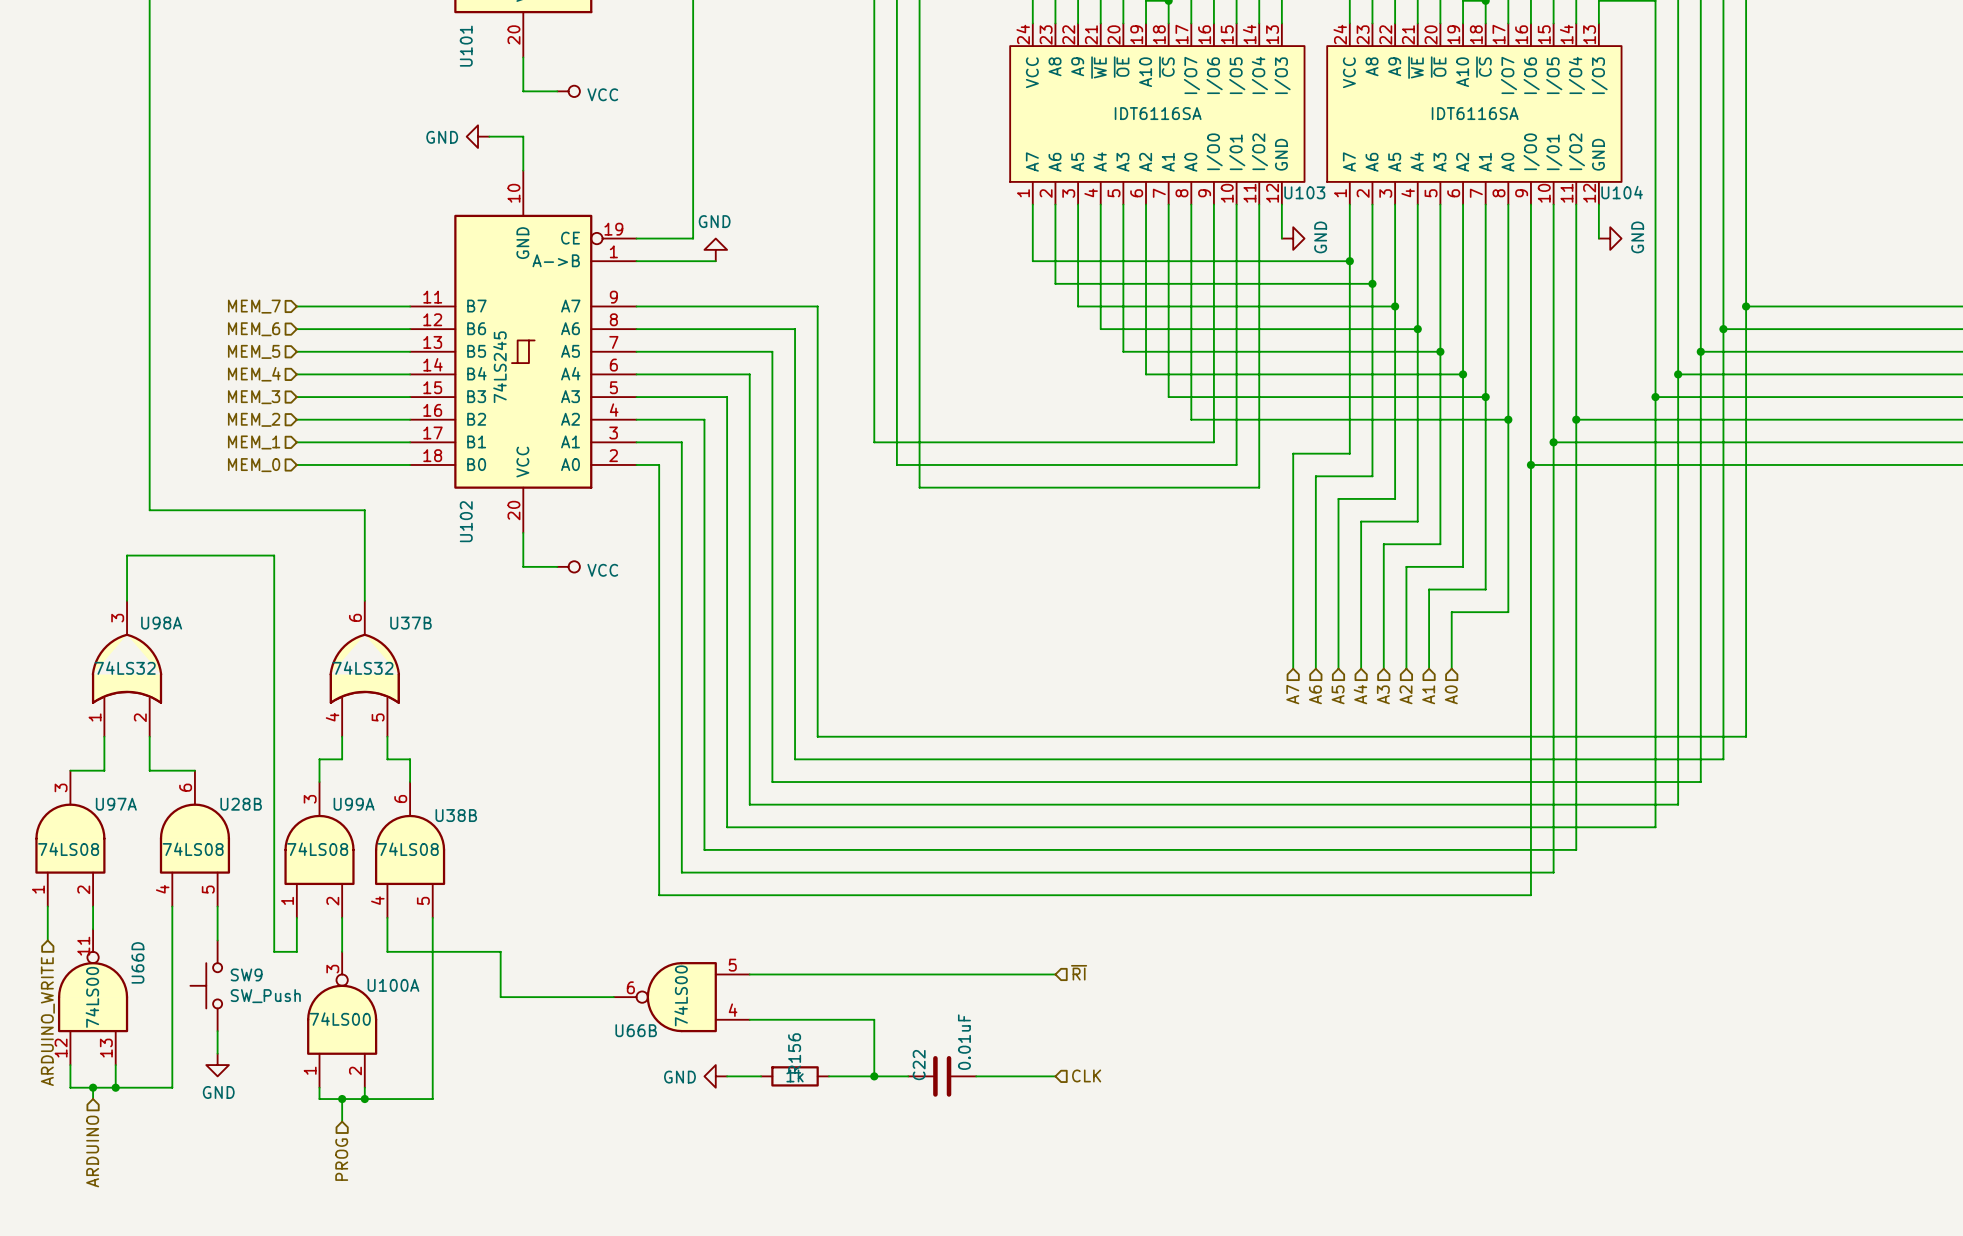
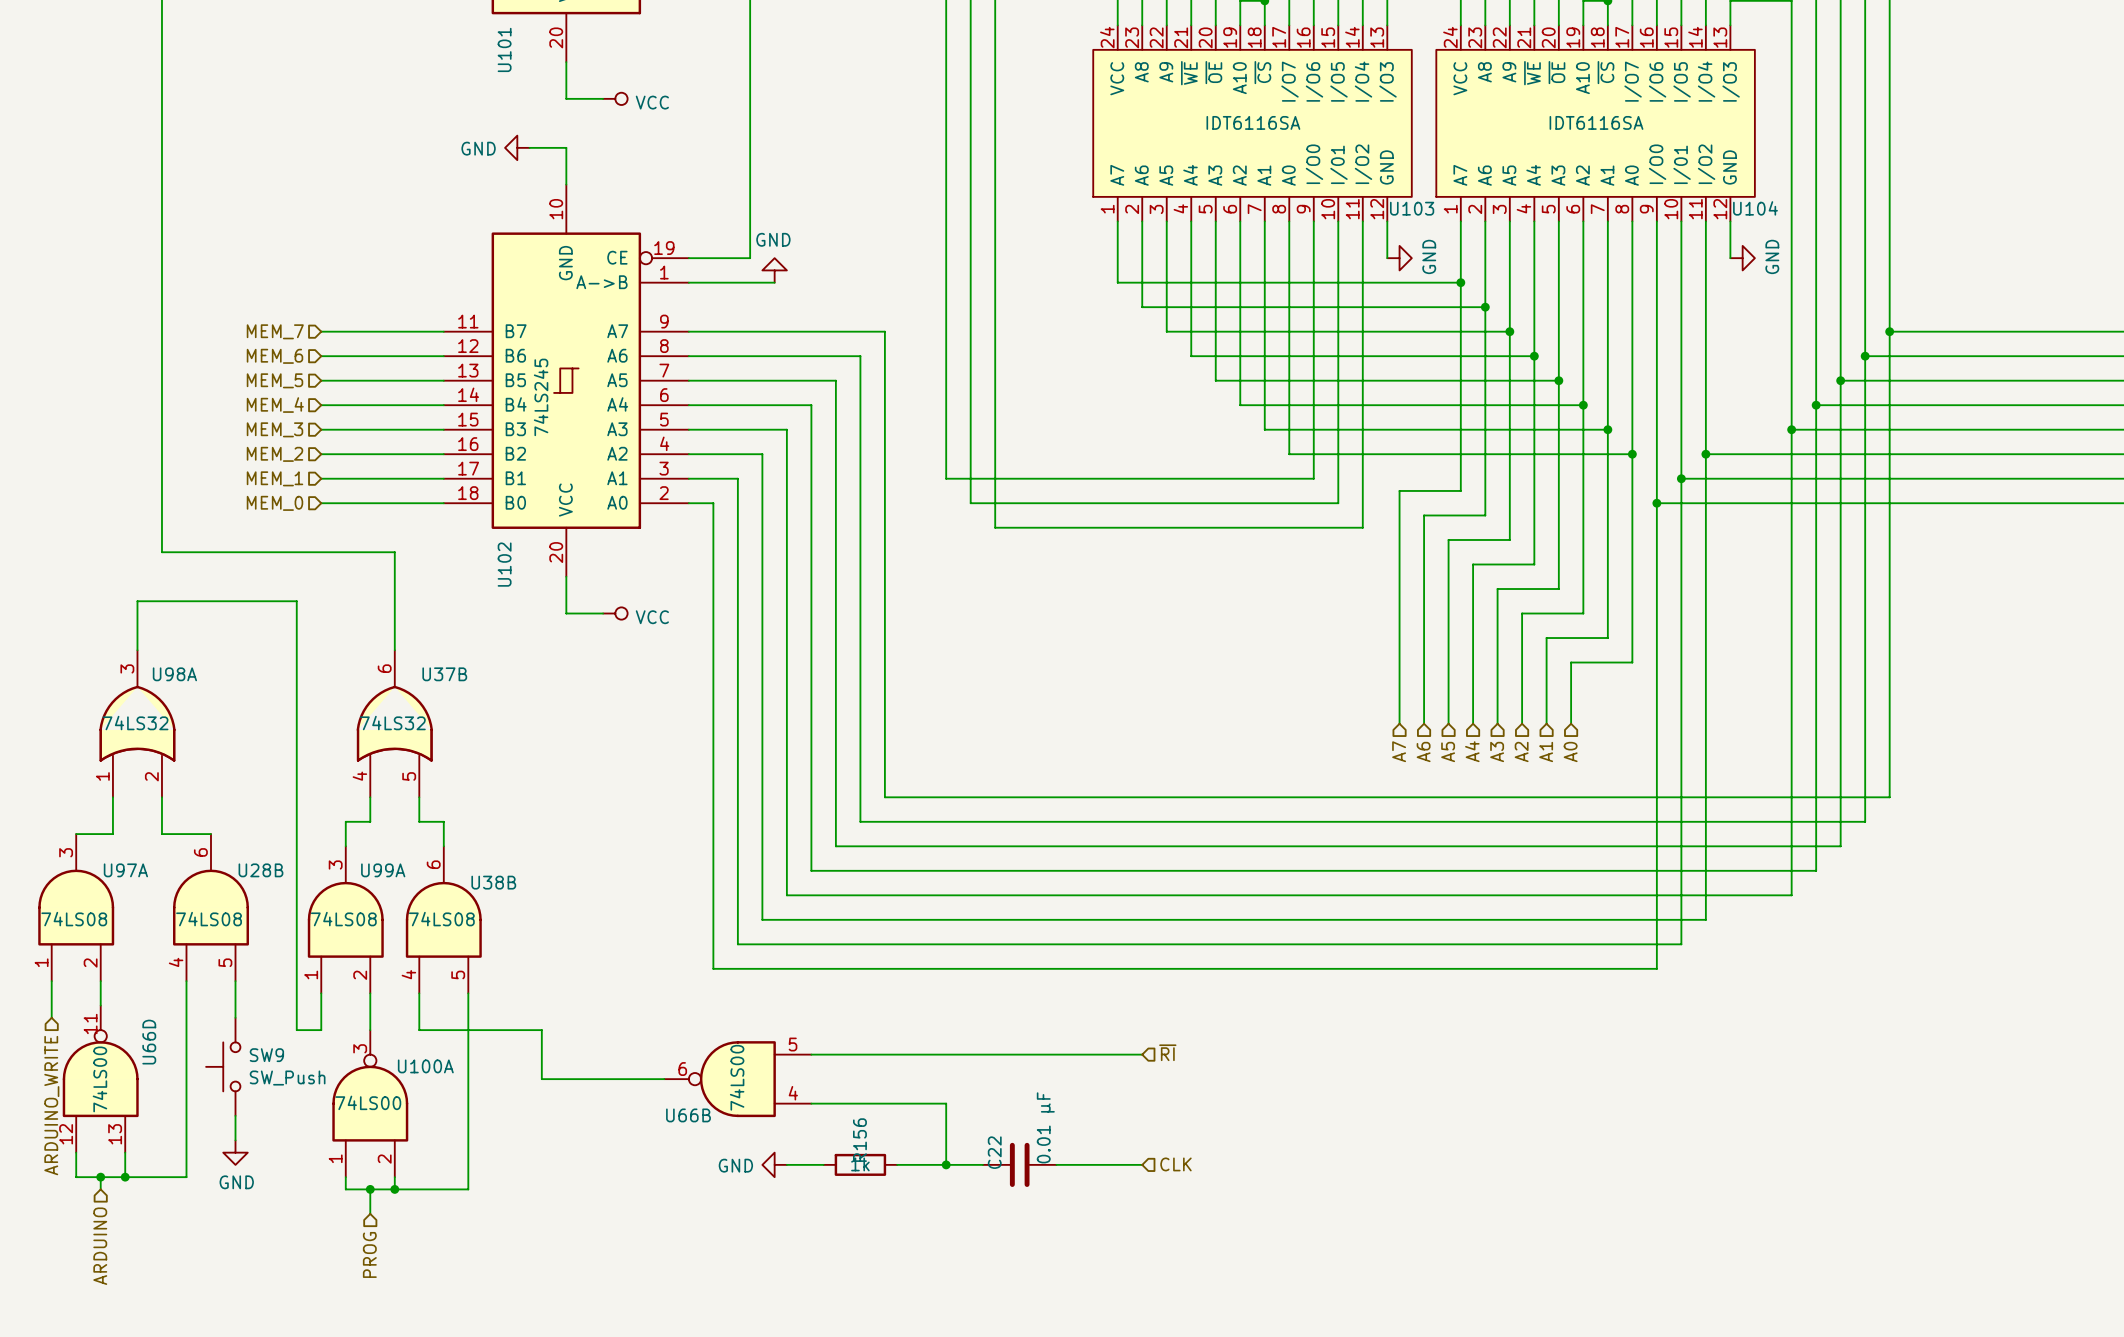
C22 value: 0.01uF (964, 1042) -> 0.01 μF (1045, 1127)

